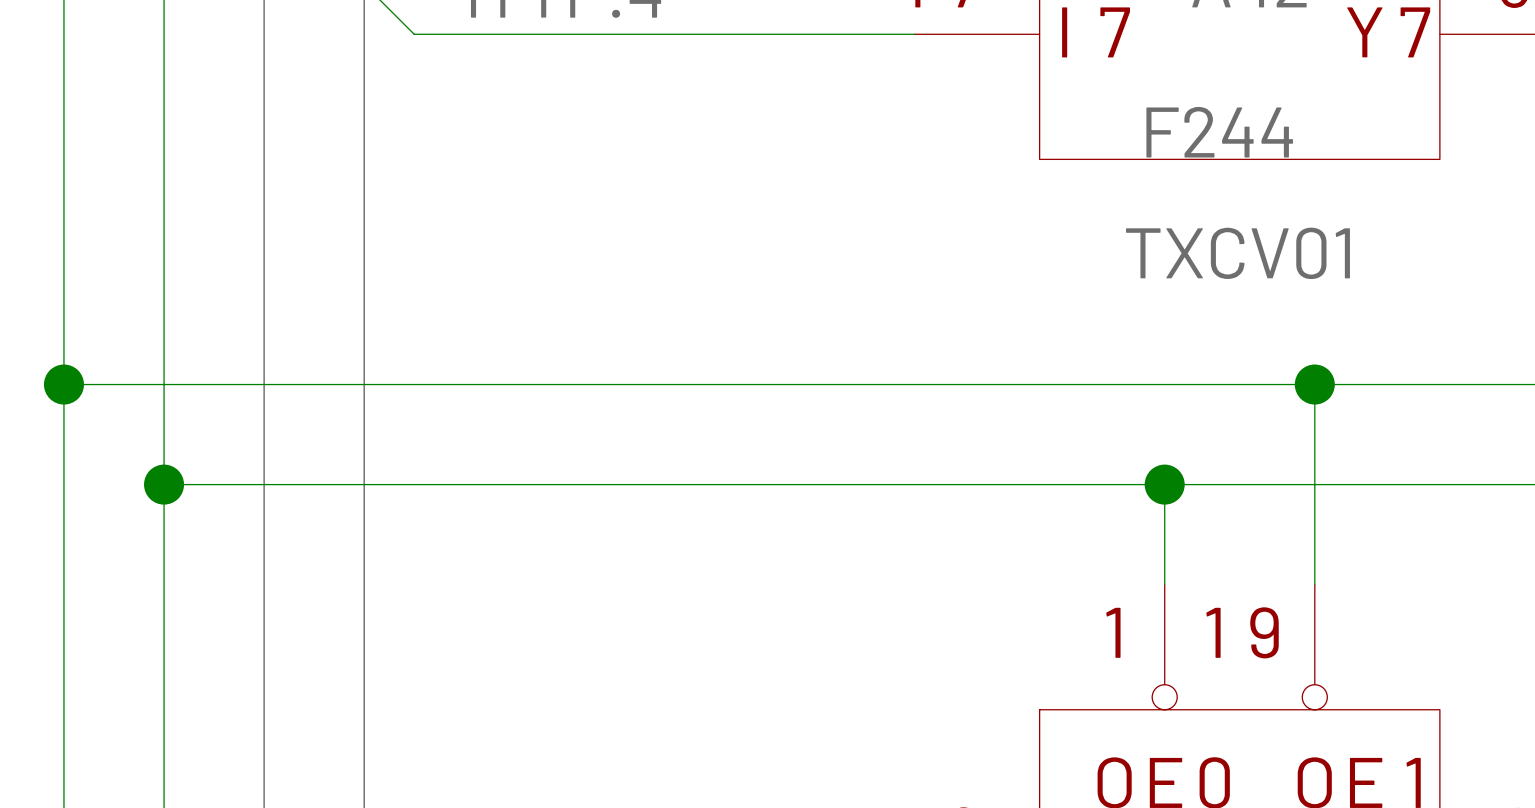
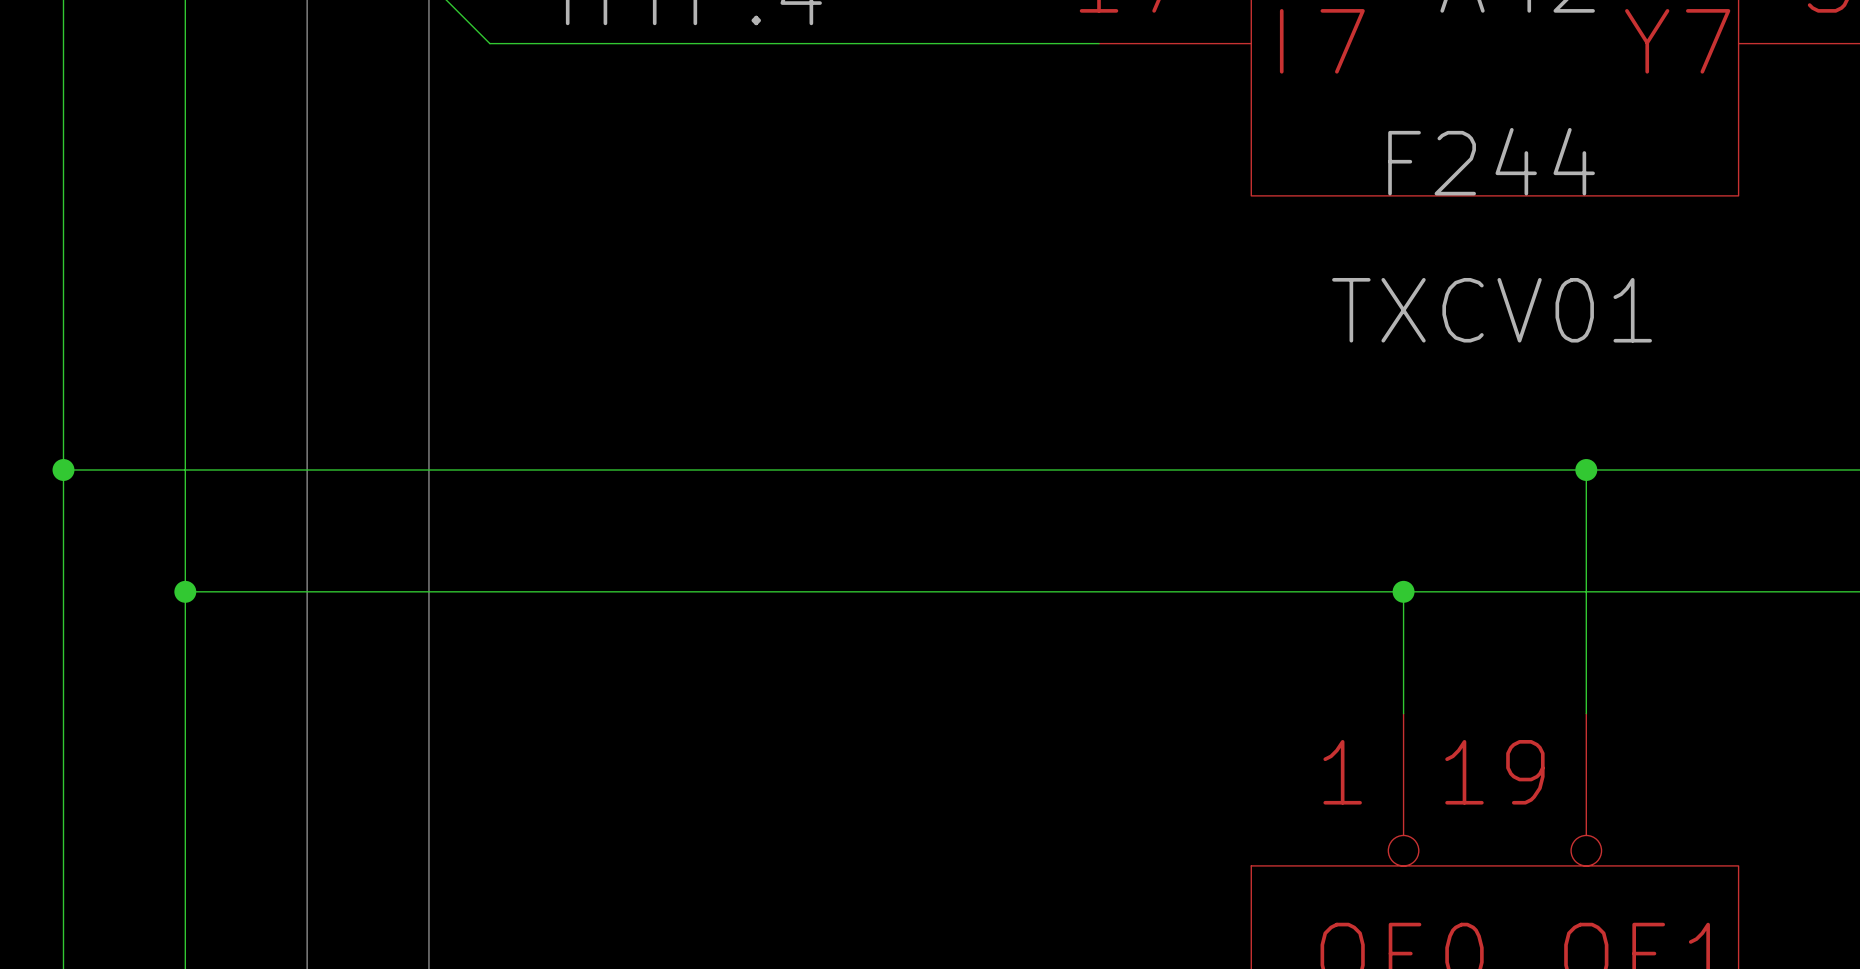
junction size: [43, 364, 84, 405] -> [52, 459, 75, 481]
junction size: [1294, 364, 1335, 405] -> [1575, 459, 1598, 481]
junction size: [144, 464, 185, 505] -> [174, 580, 197, 603]
junction size: [1144, 464, 1185, 505] -> [1392, 580, 1415, 603]

